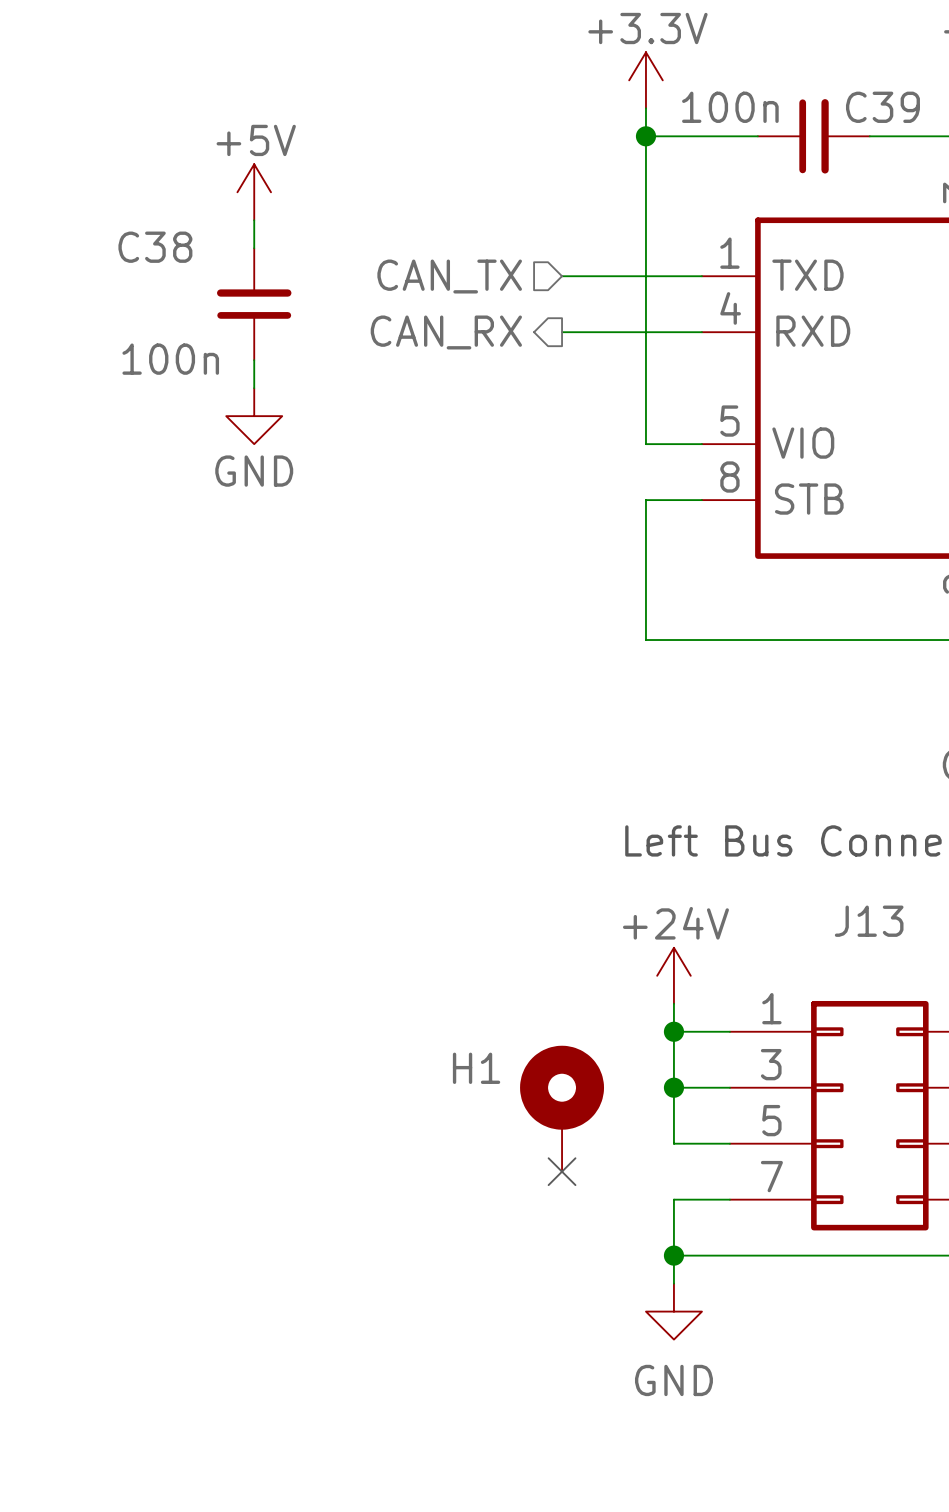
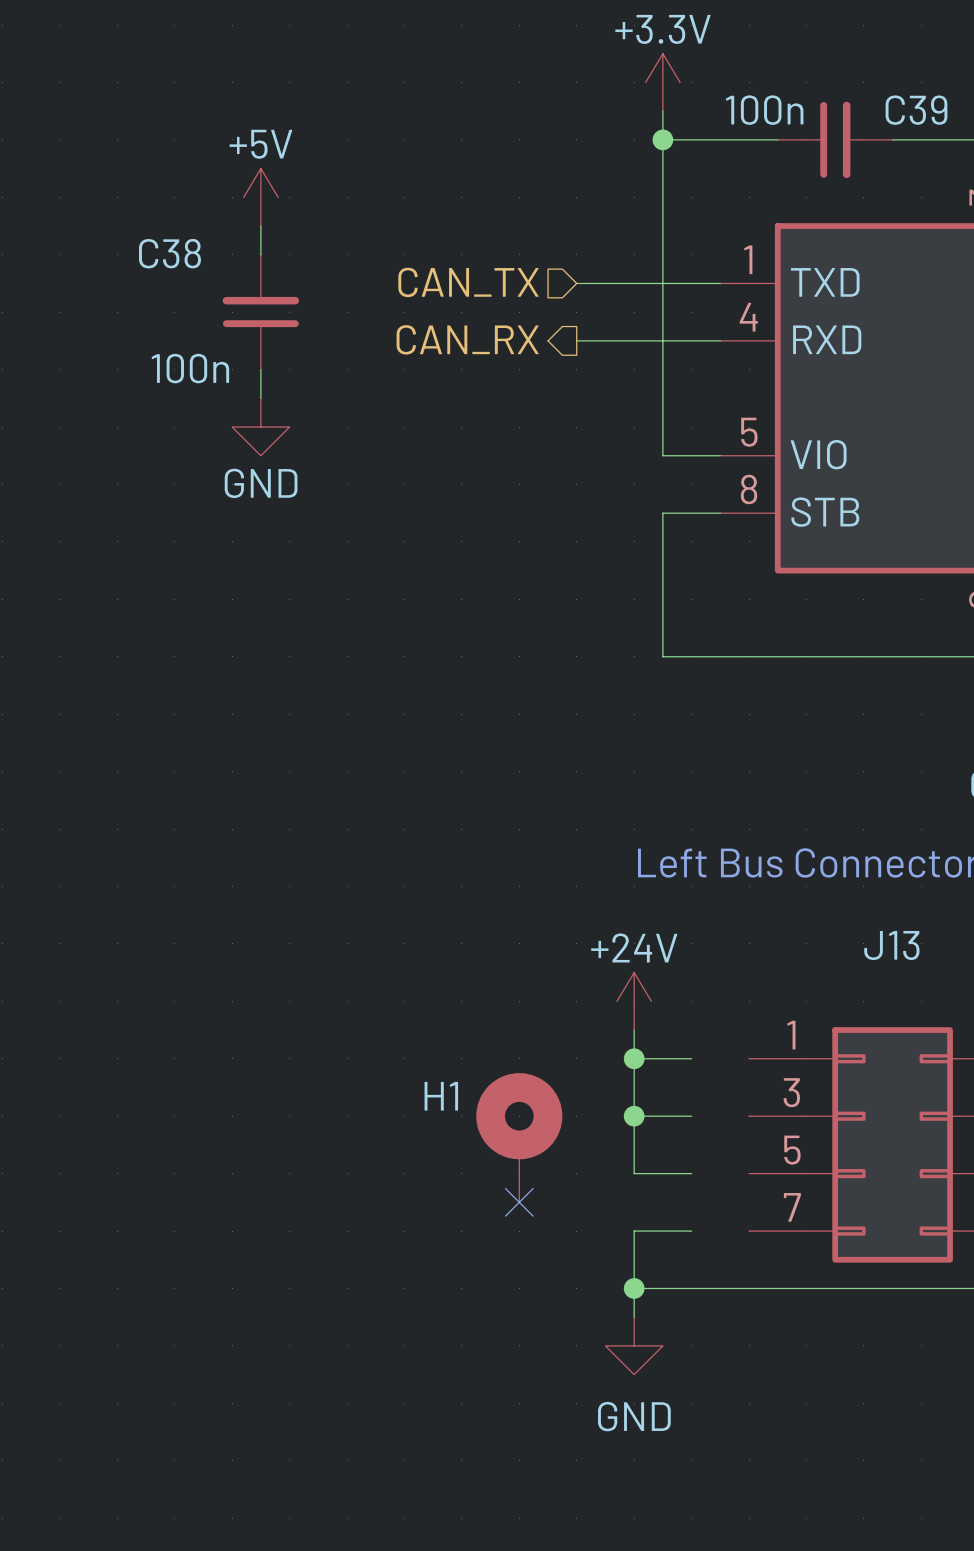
power symbol position: +24V (673, 975) -> +24V (634, 1001)
wire: (673, 1003) (673, 1143) (729, 1143) -> (634, 1030) (634, 1173) (691, 1173)
junction: none -> (634, 1058)
wire: (673, 1031) (729, 1031) -> (691, 1058) (634, 1058)
junction: (673, 1031) -> none
junction: none -> (634, 1116)
wire: (673, 1087) (729, 1087) -> (691, 1116) (634, 1116)
junction: (673, 1087) -> none
H1 position: (562, 1108) -> (519, 1137)
no-connect mark position: (562, 1171) -> (519, 1202)
wire: (729, 1199) (673, 1199) (673, 1283) -> (691, 1231) (634, 1231) (634, 1317)
wire: none -> (634, 1288) (691, 1288)
junction position: (673, 1255) -> (634, 1288)
power symbol position: GND (673, 1311) -> GND (634, 1345)

